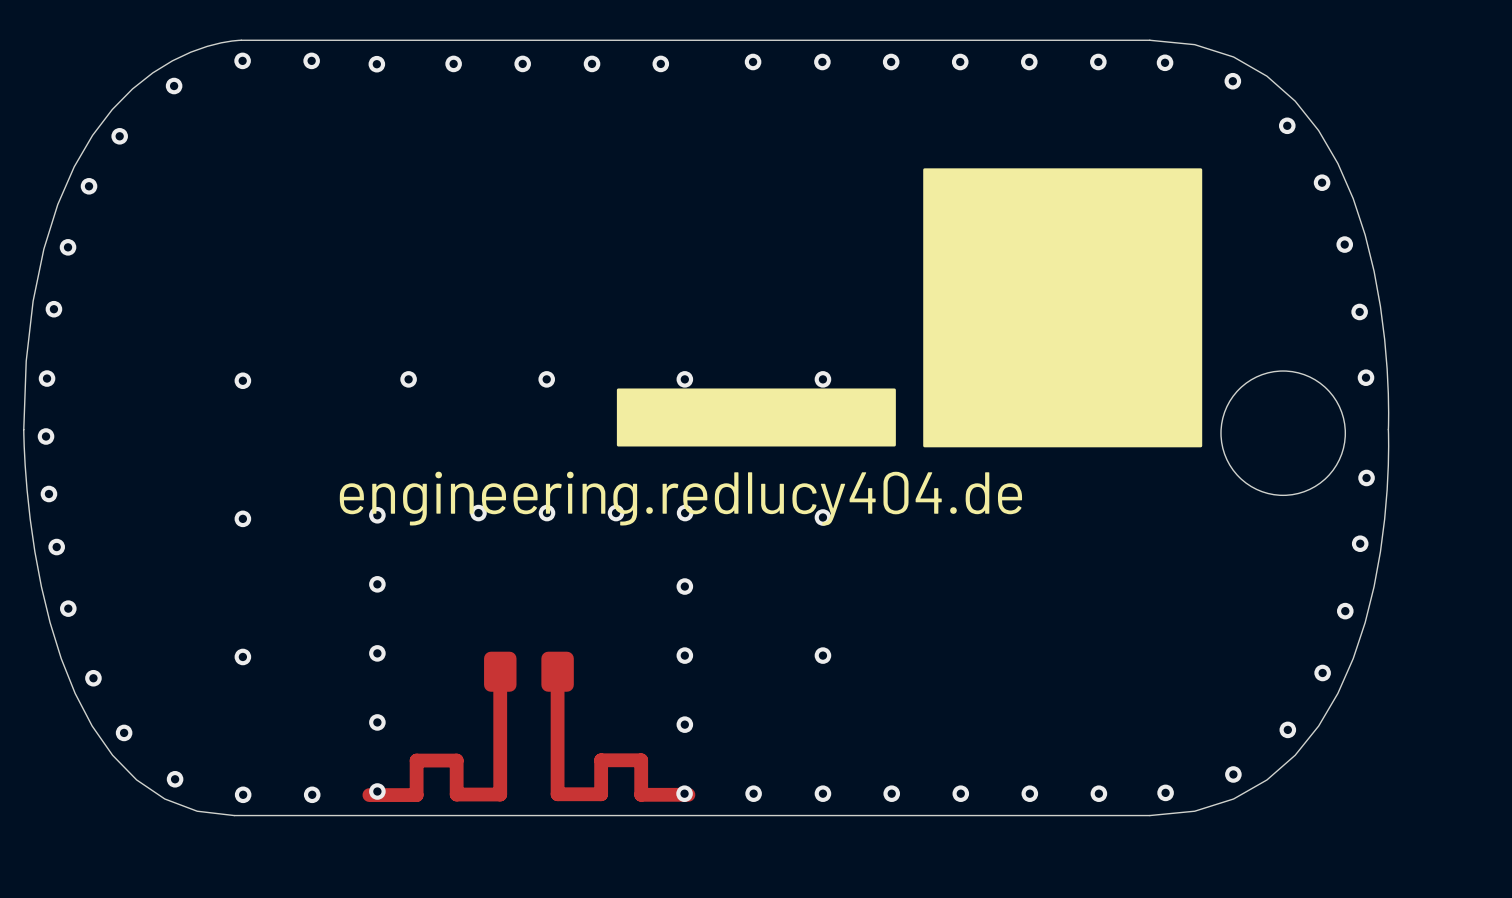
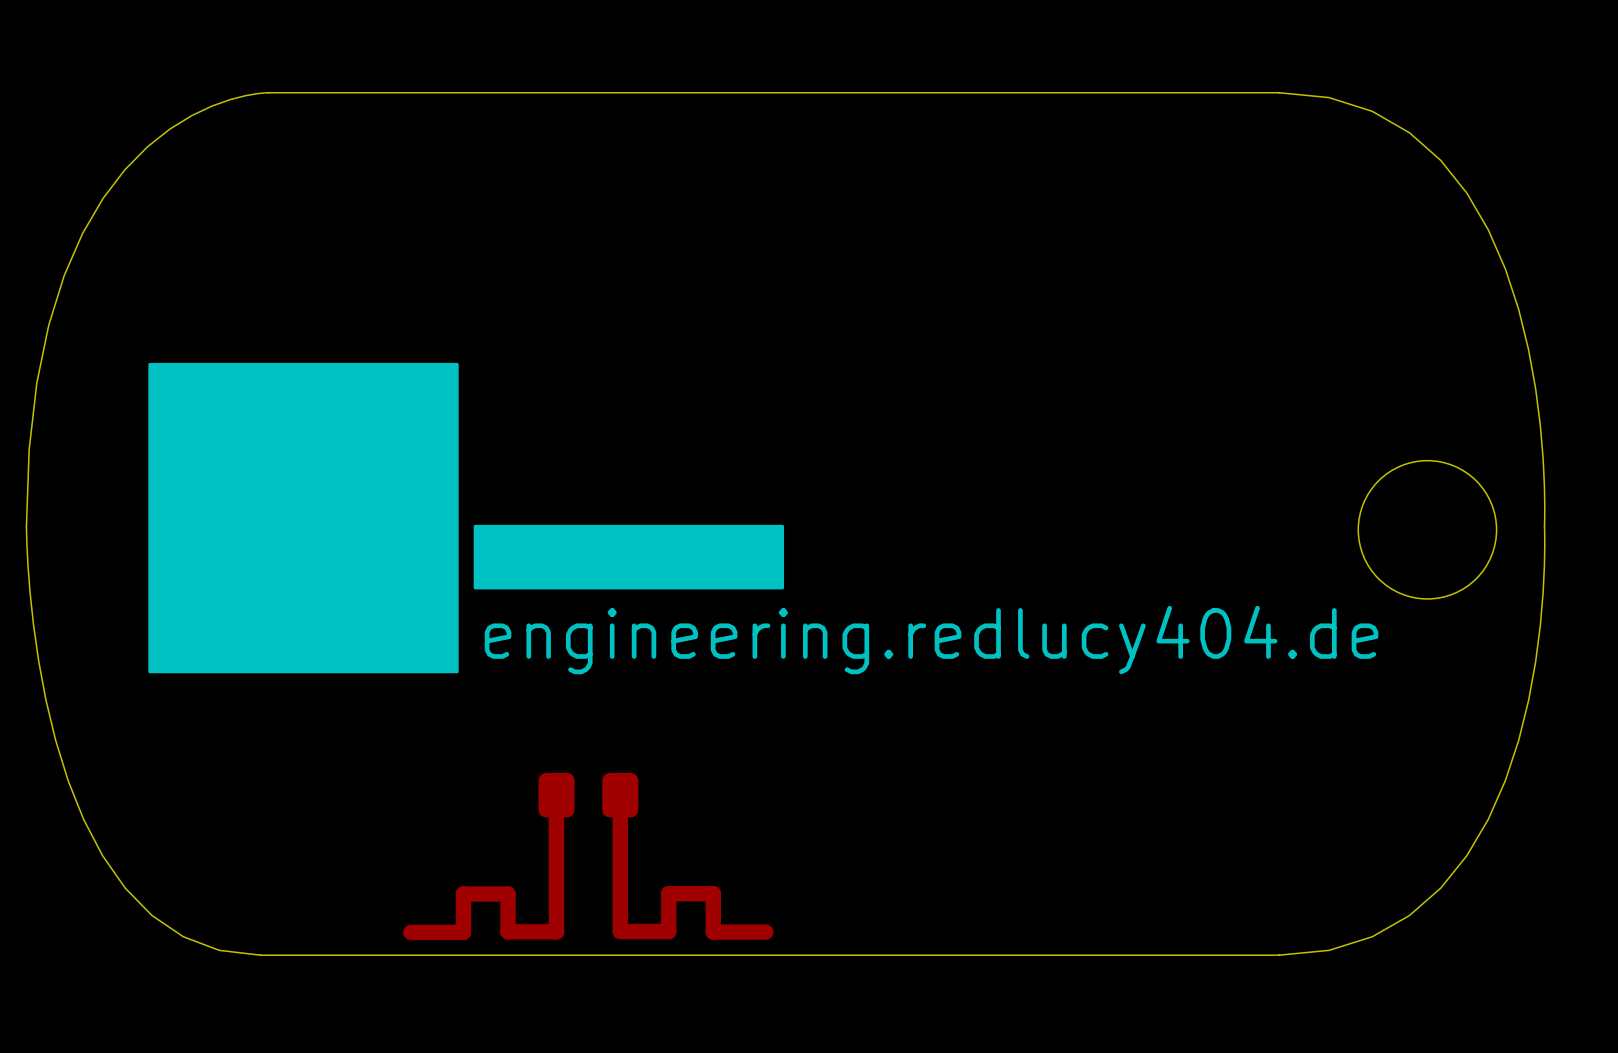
via: (242, 60) -> none
via: (311, 60) -> none
via: (753, 61) -> none
via: (822, 61) -> none
via: (891, 61) -> none
via: (960, 61) -> none
via: (1029, 61) -> none
via: (1098, 61) -> none
via: (1165, 62) -> none
via: (453, 63) -> none
via: (522, 63) -> none
via: (592, 63) -> none
via: (660, 63) -> none
via: (376, 64) -> none
via: (1232, 81) -> none
via: (174, 86) -> none
via: (1287, 125) -> none
via: (119, 136) -> none
drawing: [923, 168, 1203, 448] -> none
via: (1322, 182) -> none
via: (89, 186) -> none
via: (1344, 244) -> none
via: (68, 247) -> none
drawing: none -> [148, 362, 459, 674]
via: (53, 309) -> none
via: (1359, 311) -> none
via: (1366, 377) -> none
via: (47, 378) -> none
via: (408, 379) -> none
via: (546, 379) -> none
via: (684, 379) -> none
via: (822, 379) -> none
via: (242, 380) -> none
drawing position: (756, 417) -> (628, 557)
via: (46, 436) -> none
via: (1366, 477) -> none
via: (48, 494) -> none
text position: engineering.redlucy404.de (680, 498) -> engineering.redlucy404.de (931, 640)
via: (478, 513) -> none
via: (547, 513) -> none
via: (616, 513) -> none
via: (685, 513) -> none
via: (377, 515) -> none
via: (822, 517) -> none
via: (242, 518) -> none
via: (1360, 543) -> none
via: (56, 547) -> none
via: (377, 584) -> none
via: (684, 586) -> none
via: (68, 608) -> none
via: (1345, 611) -> none
via: (377, 653) -> none
via: (684, 655) -> none
via: (822, 655) -> none
via: (242, 656) -> none
via: (1322, 672) -> none
via: (93, 678) -> none
via: (377, 722) -> none
via: (684, 724) -> none
via: (1287, 729) -> none
via: (124, 732) -> none
via: (1233, 774) -> none
via: (175, 779) -> none
via: (377, 791) -> none
via: (1165, 792) -> none
via: (684, 793) -> none
via: (753, 793) -> none
via: (822, 793) -> none
via: (891, 793) -> none
via: (960, 793) -> none
via: (1029, 793) -> none
via: (1098, 793) -> none
via: (243, 794) -> none
via: (312, 794) -> none

